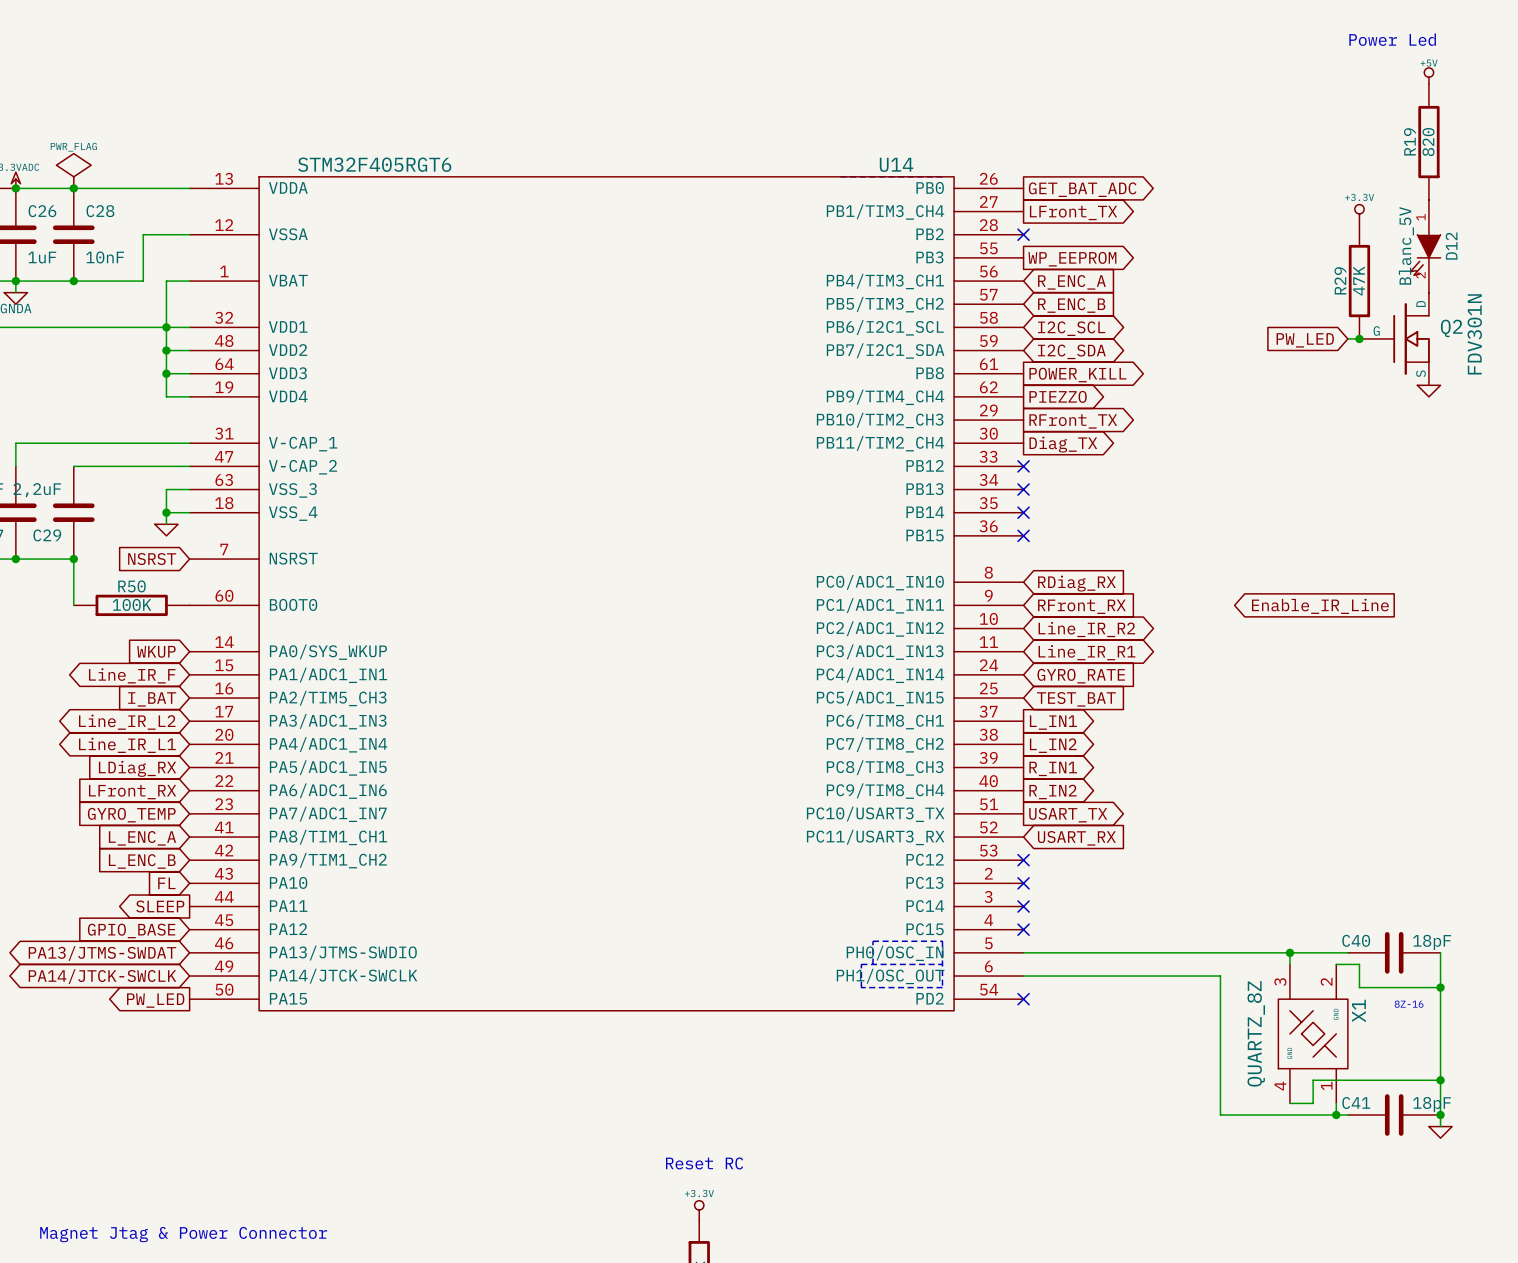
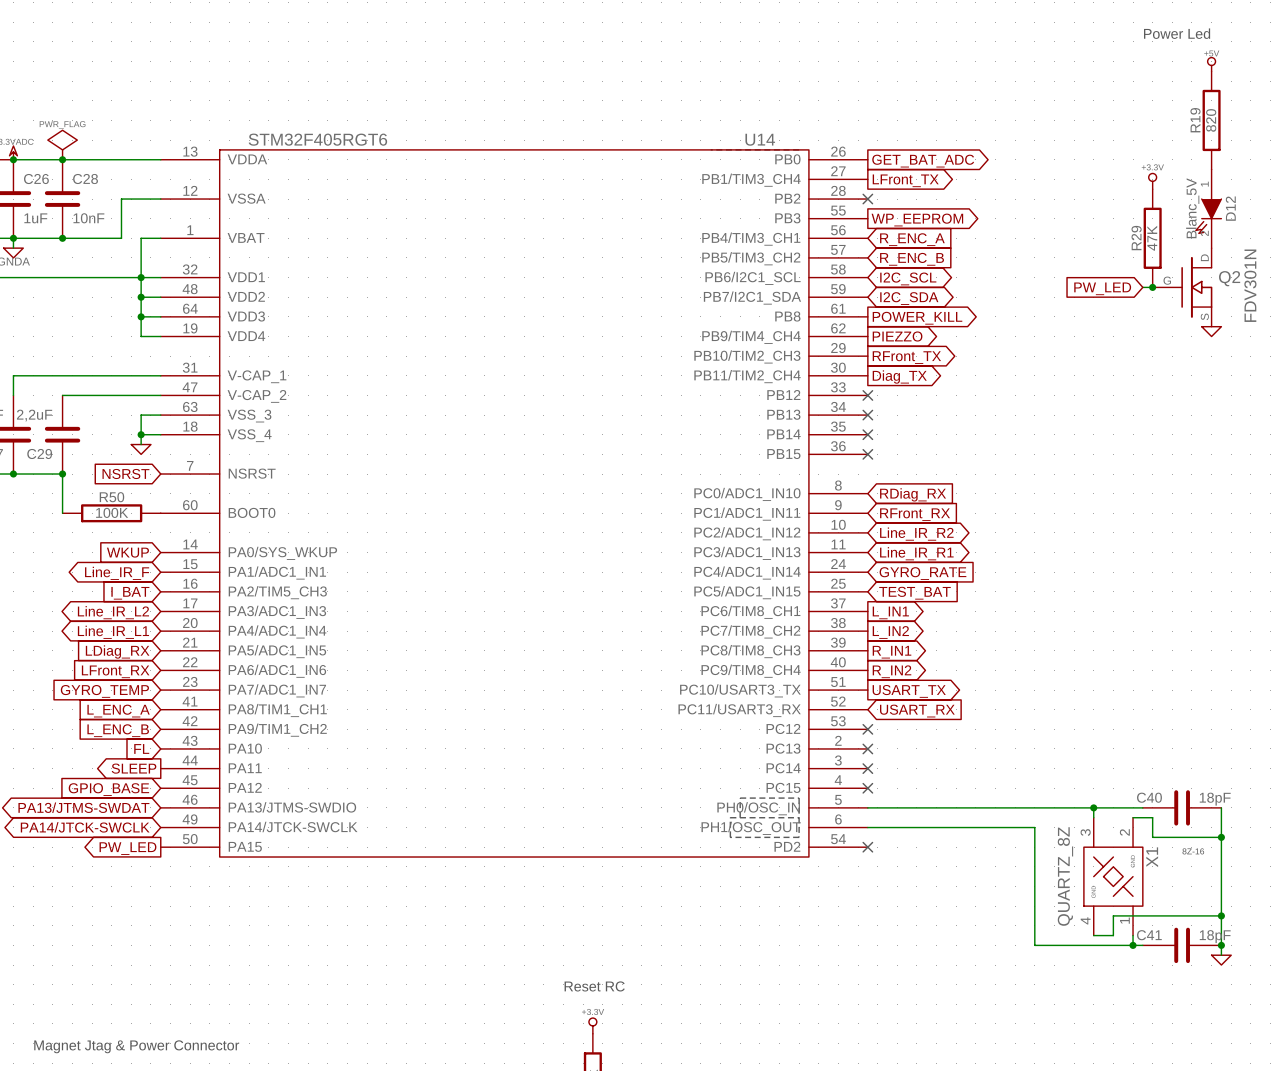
global label: Enable_IR_Line (1320, 606) -> none

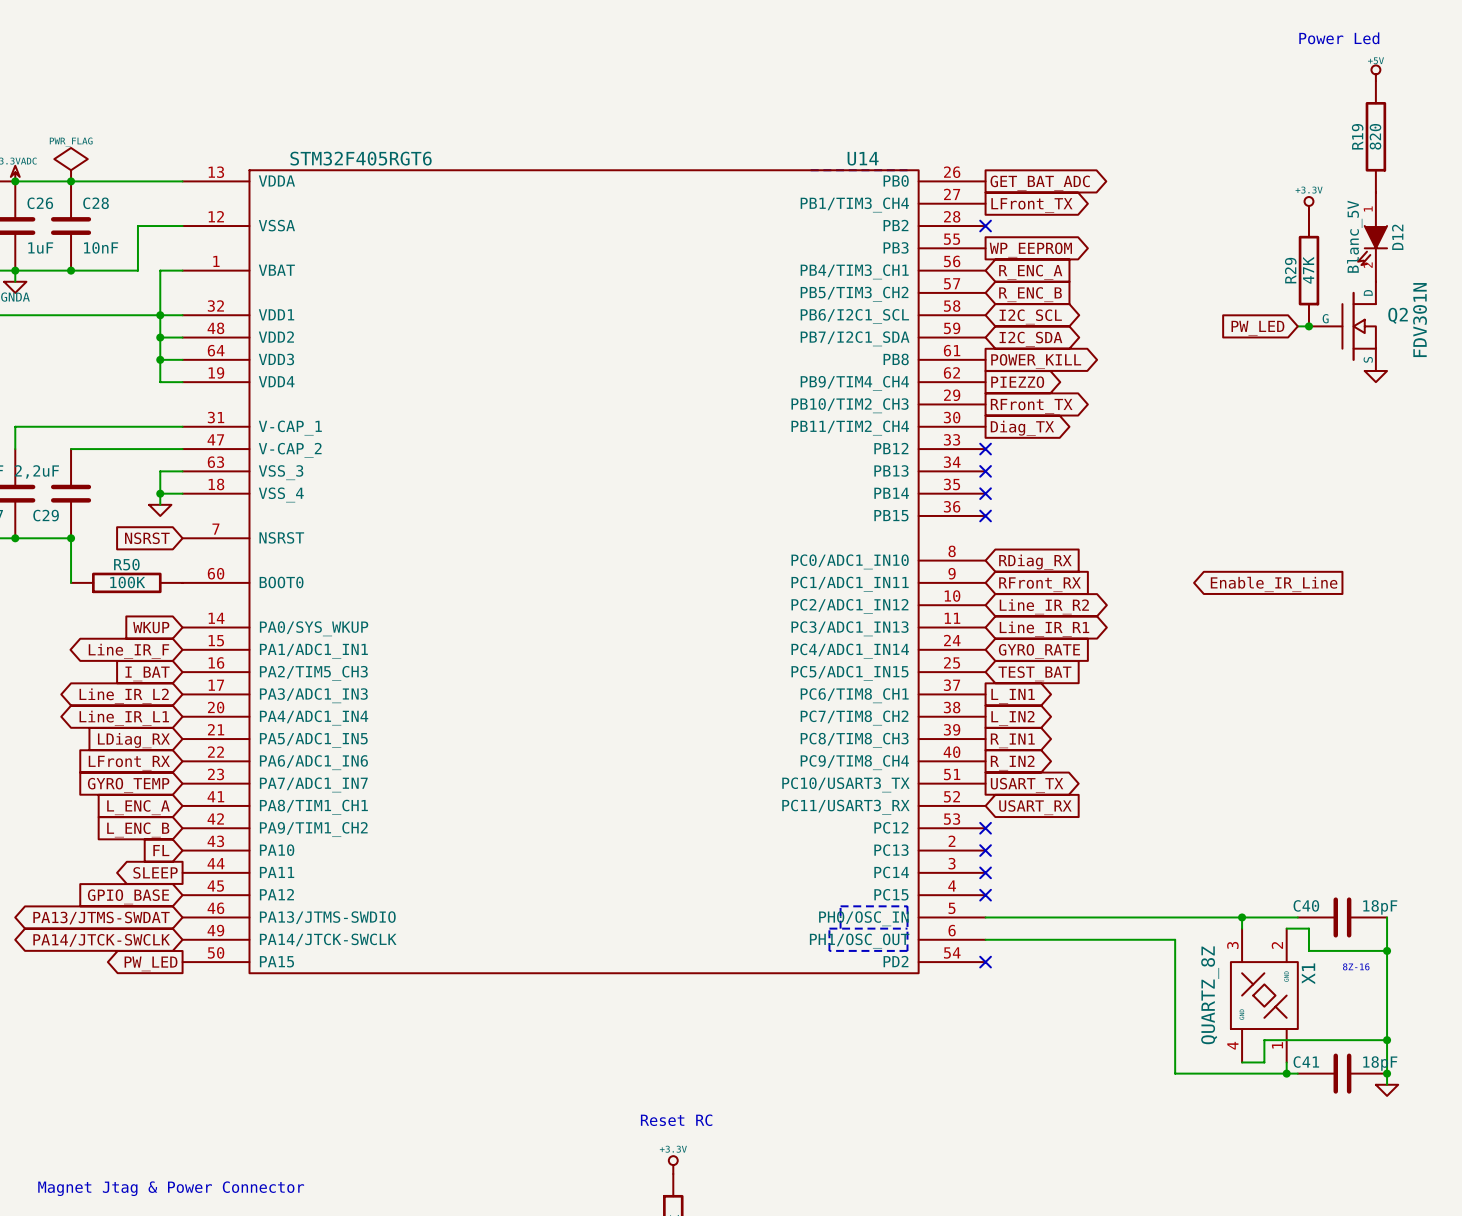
global label: none -> Enable_IR_Line (1274, 584)

